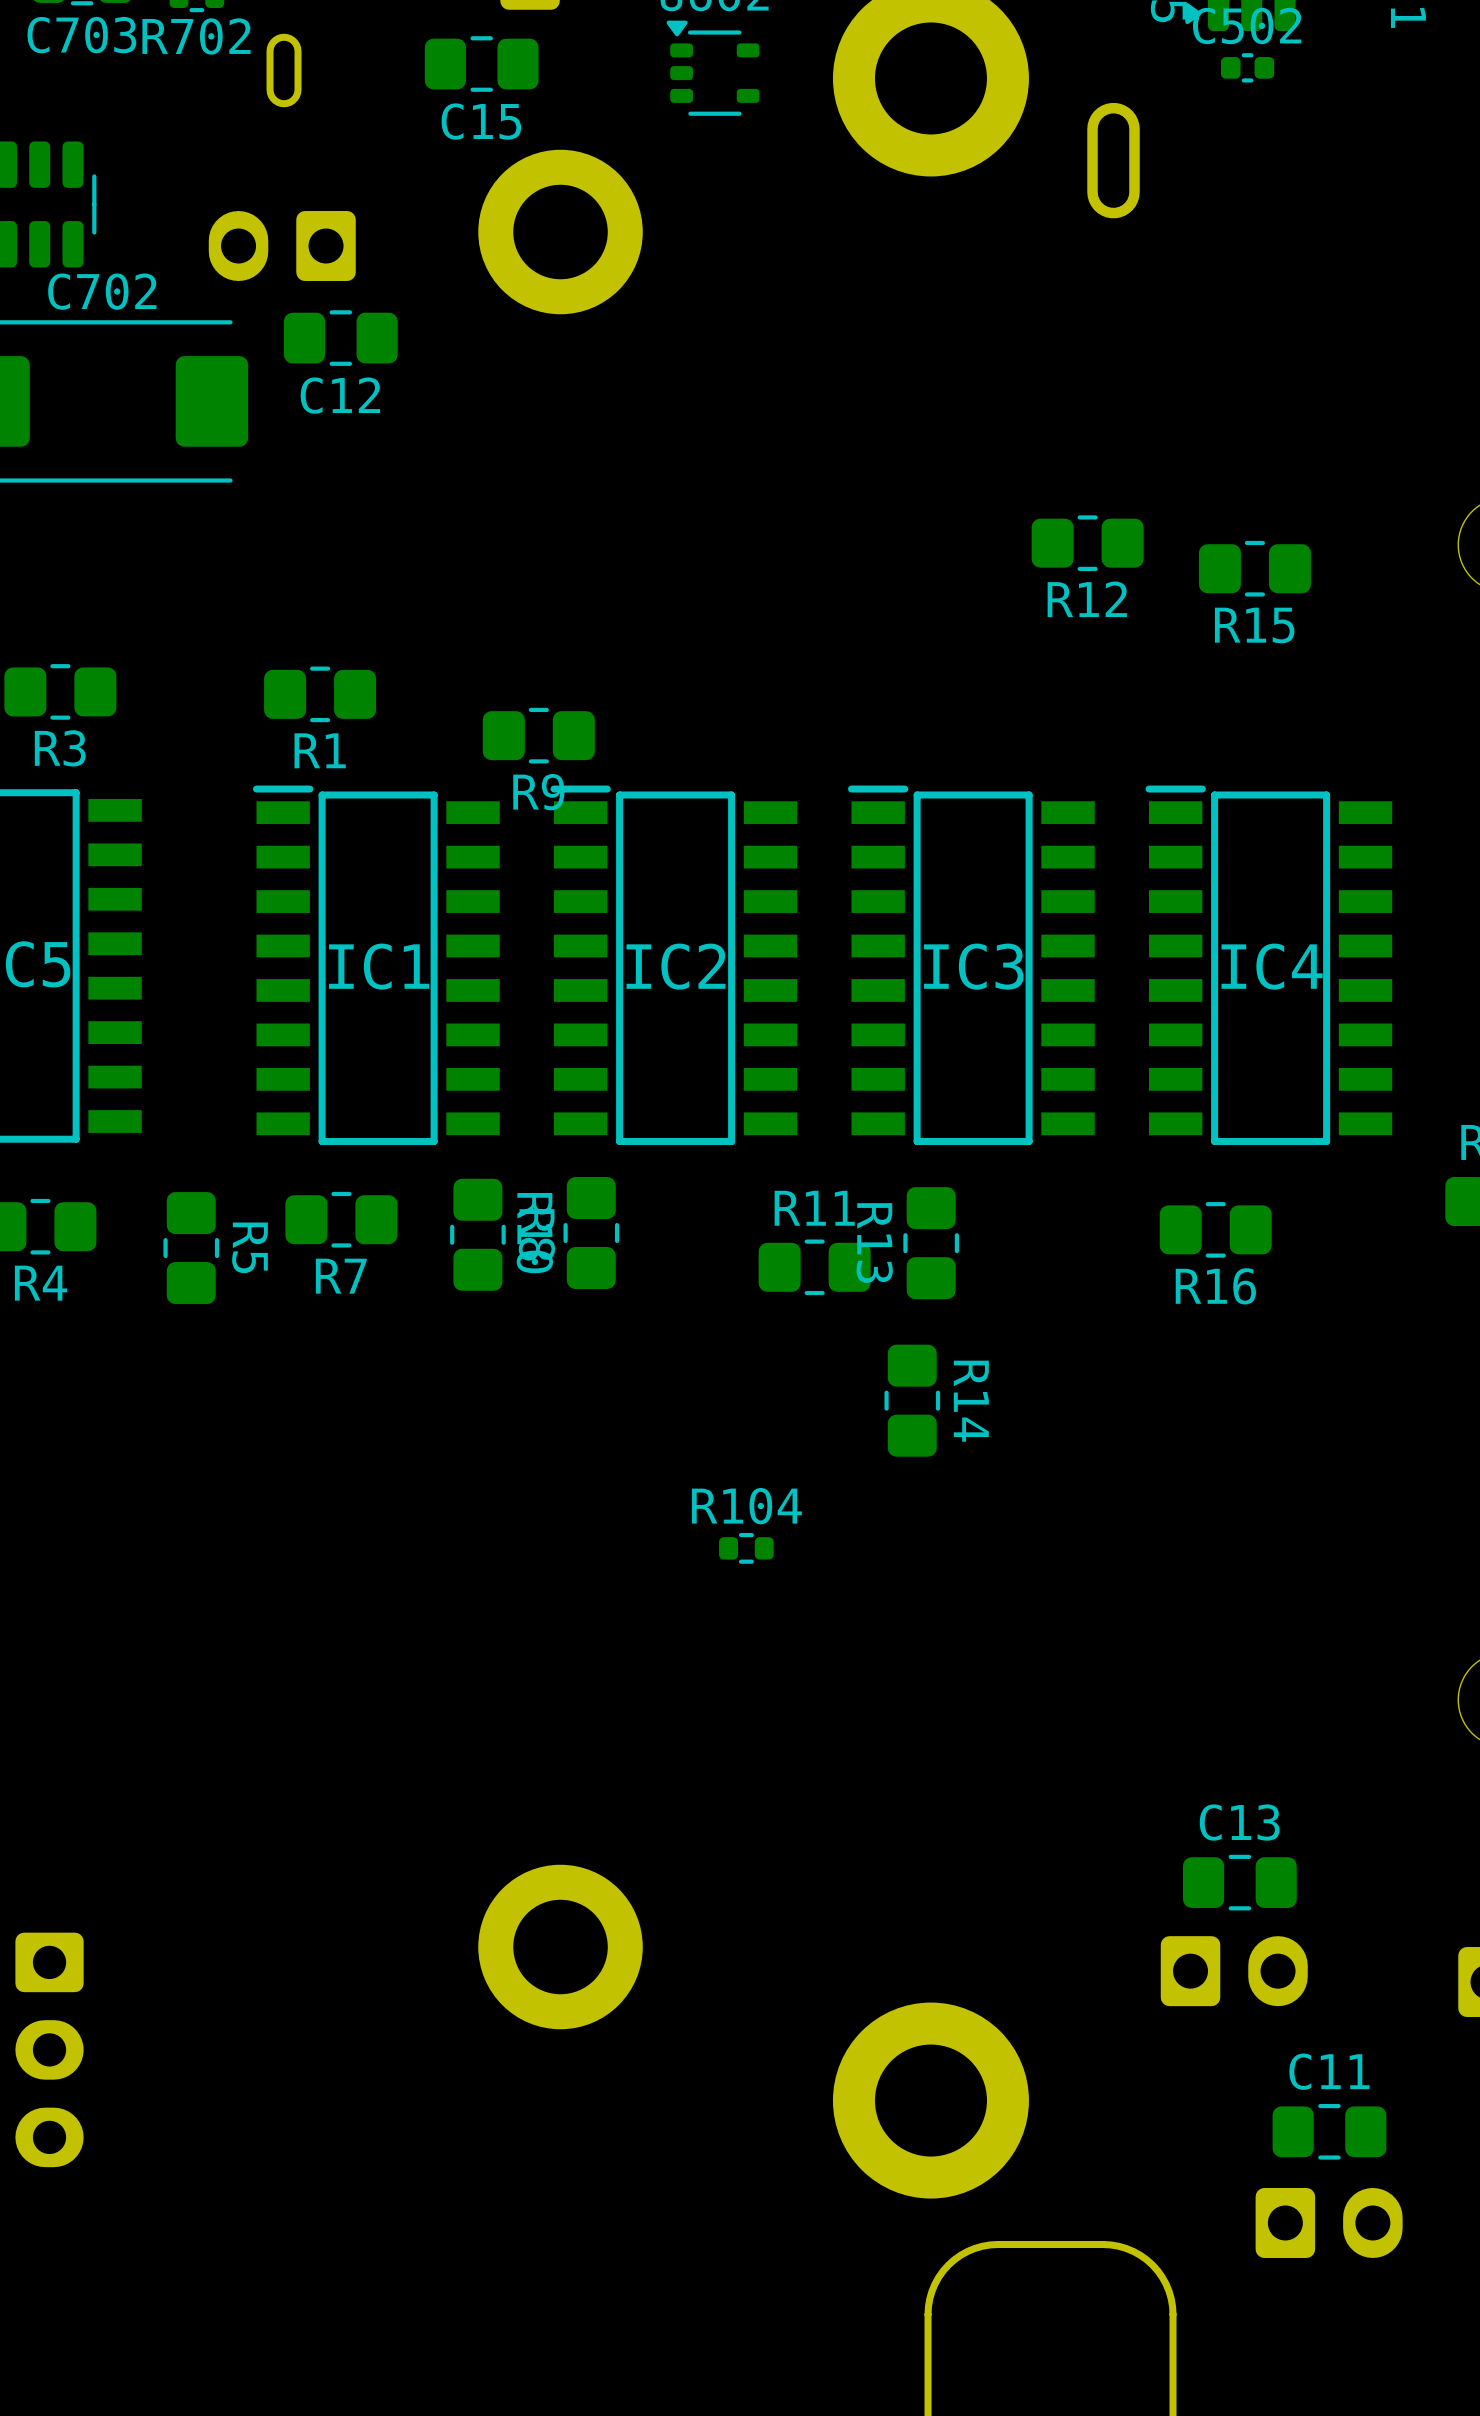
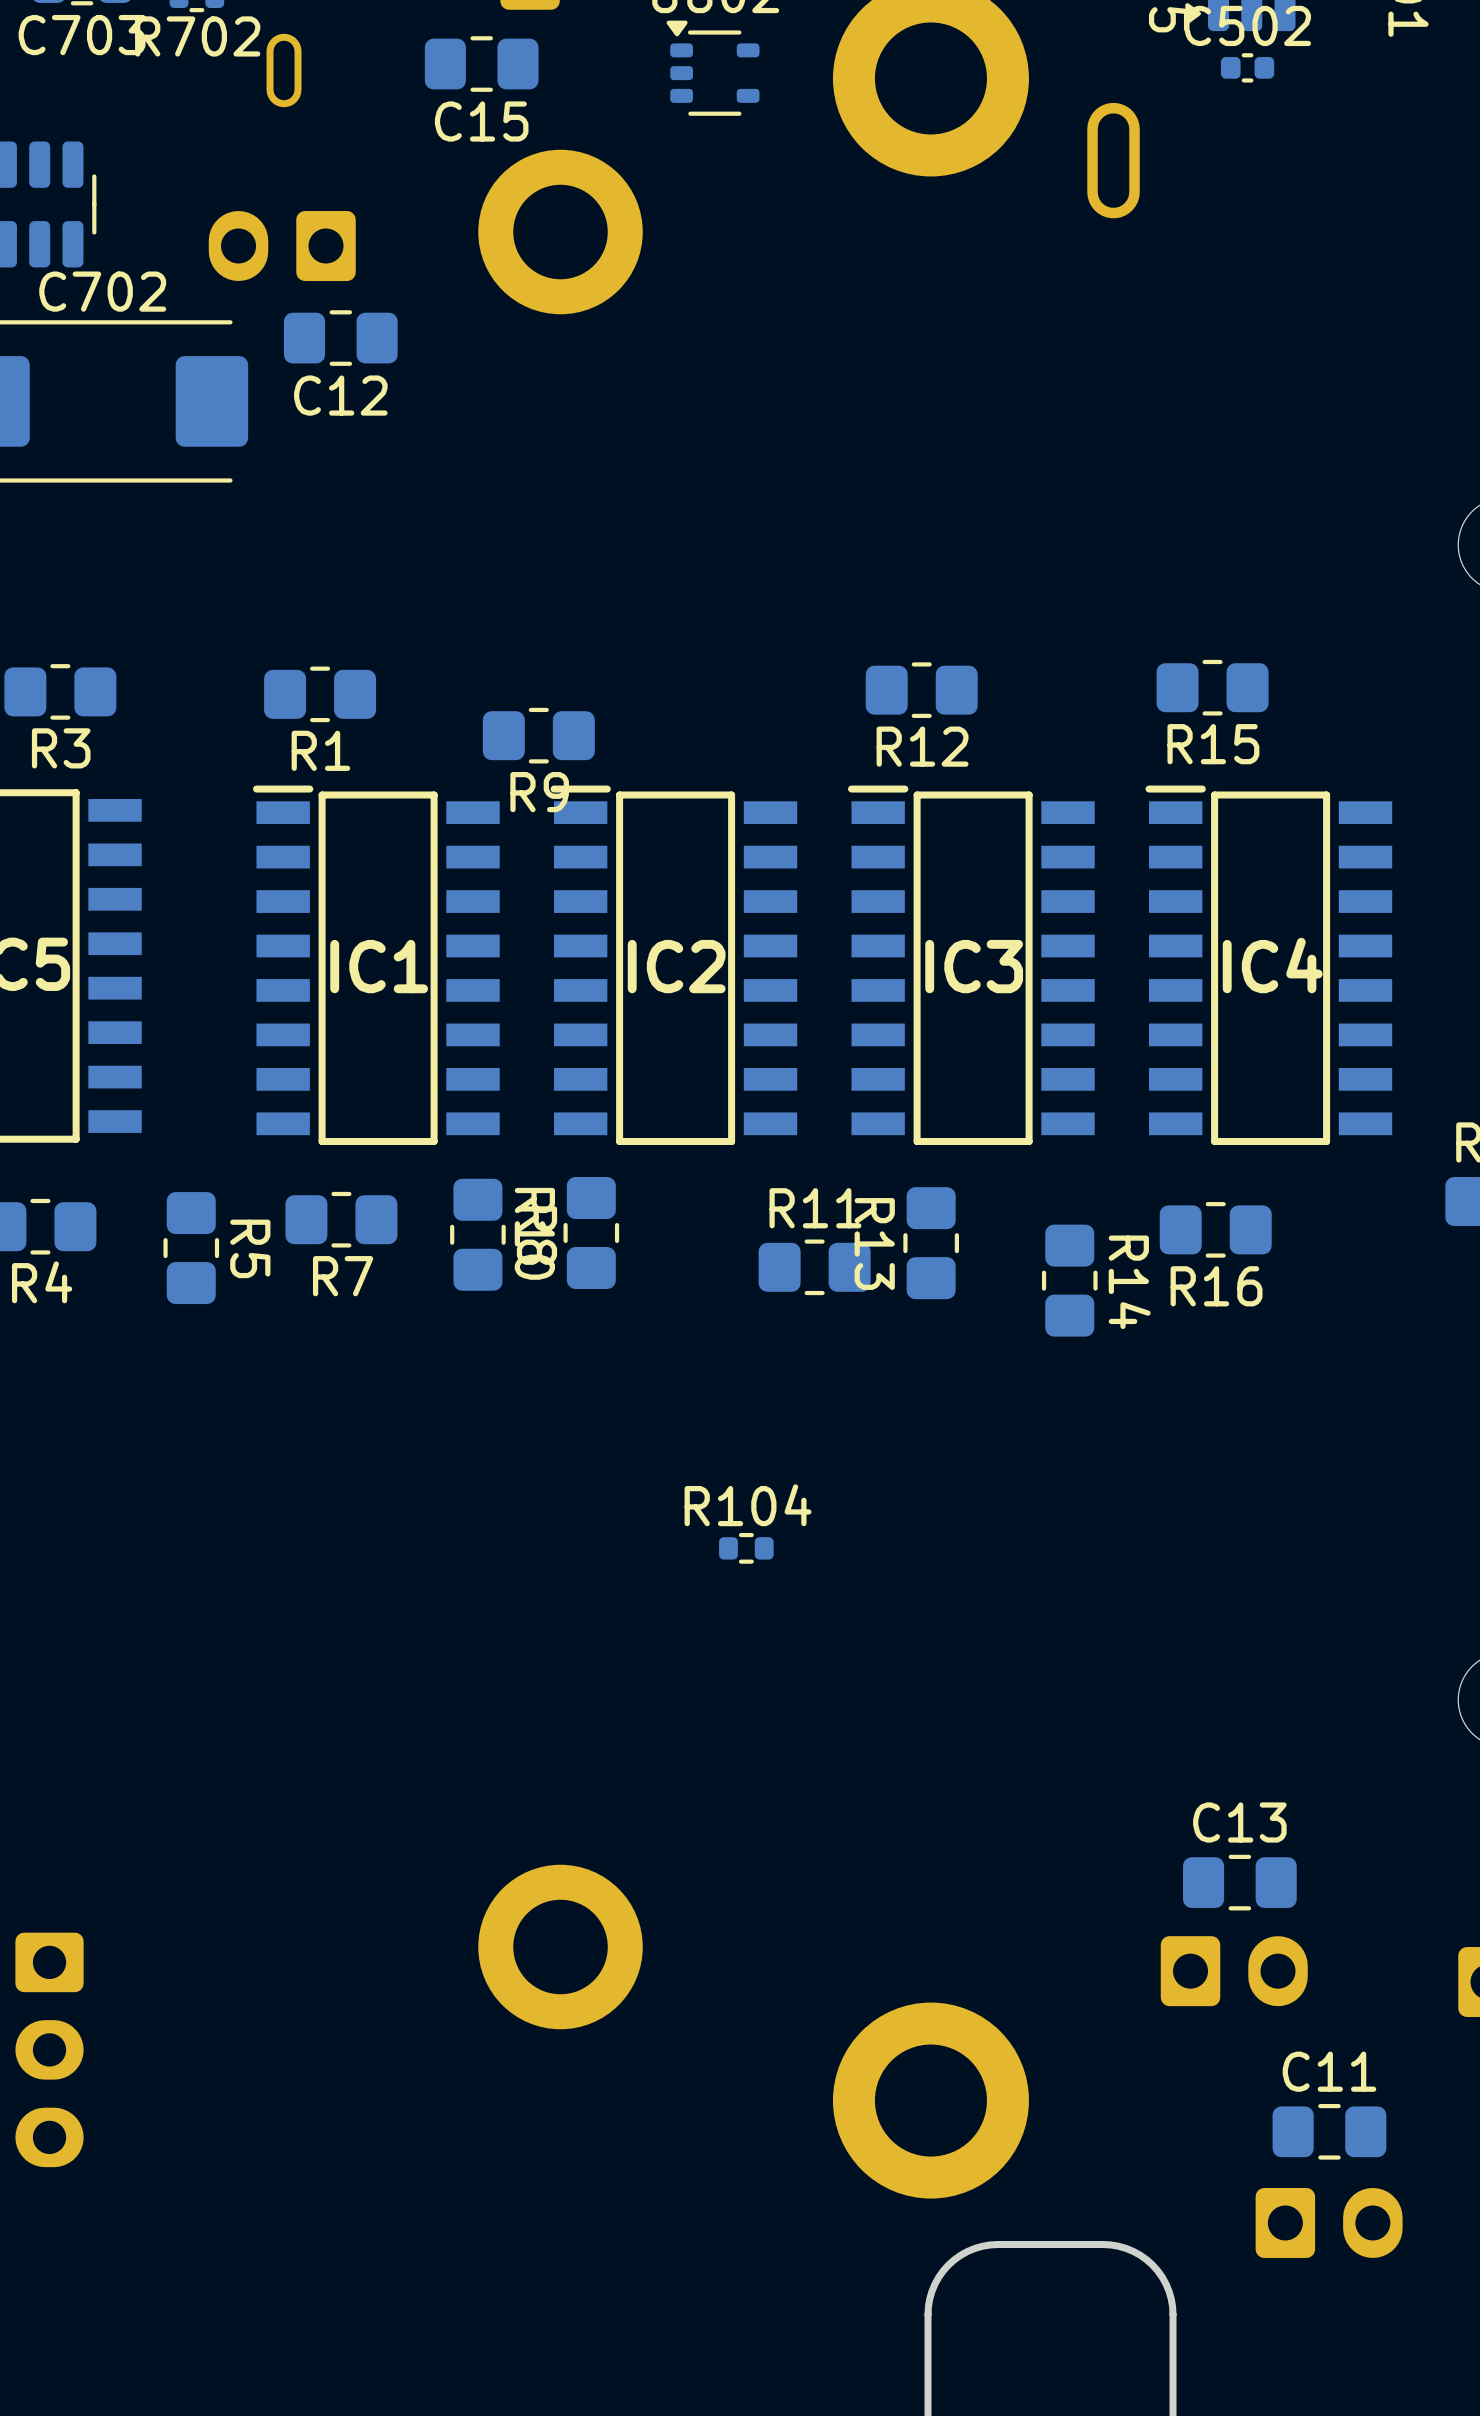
R12 position: (1087, 543) -> (921, 690)
R15 position: (1254, 568) -> (1212, 687)
R14 position: (912, 1400) -> (1069, 1280)

